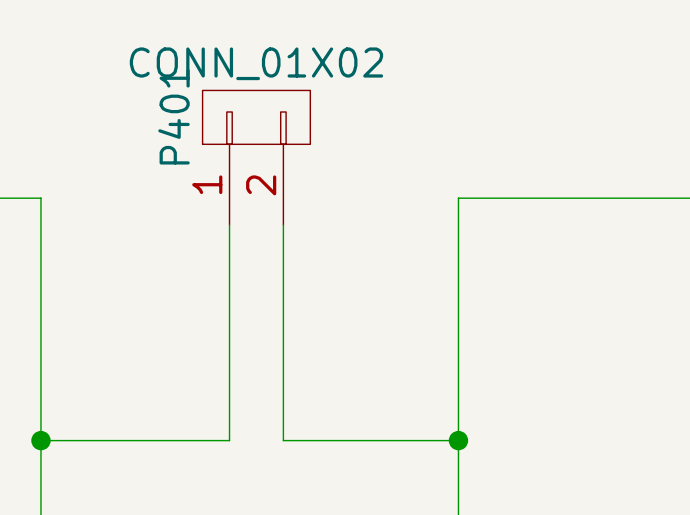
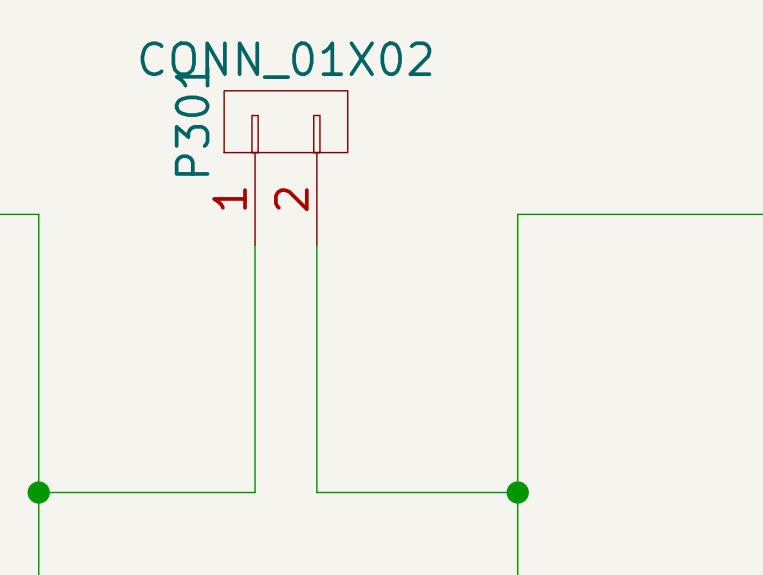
P401 name: P401 (174, 116) -> P301 (192, 120)

